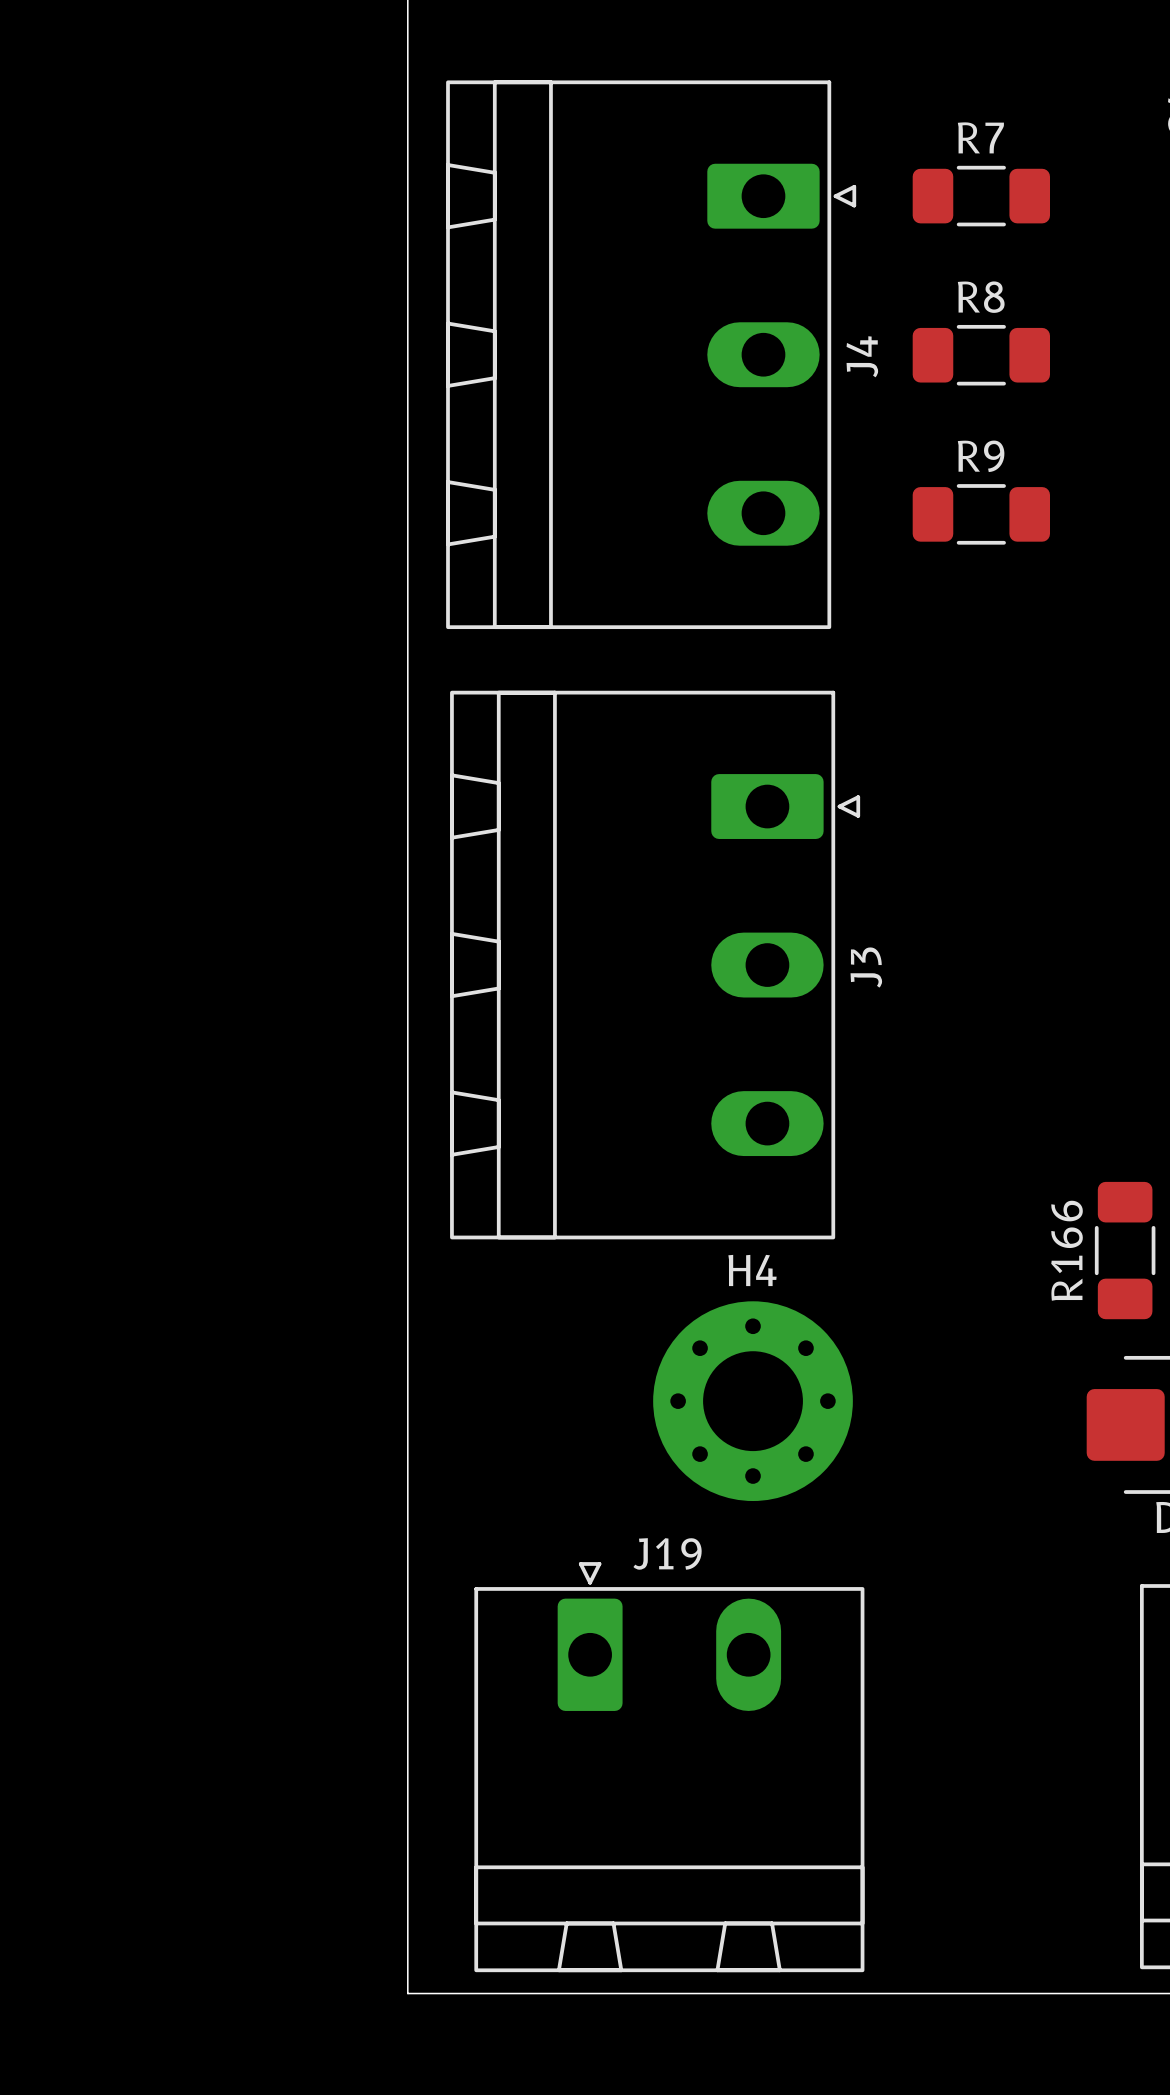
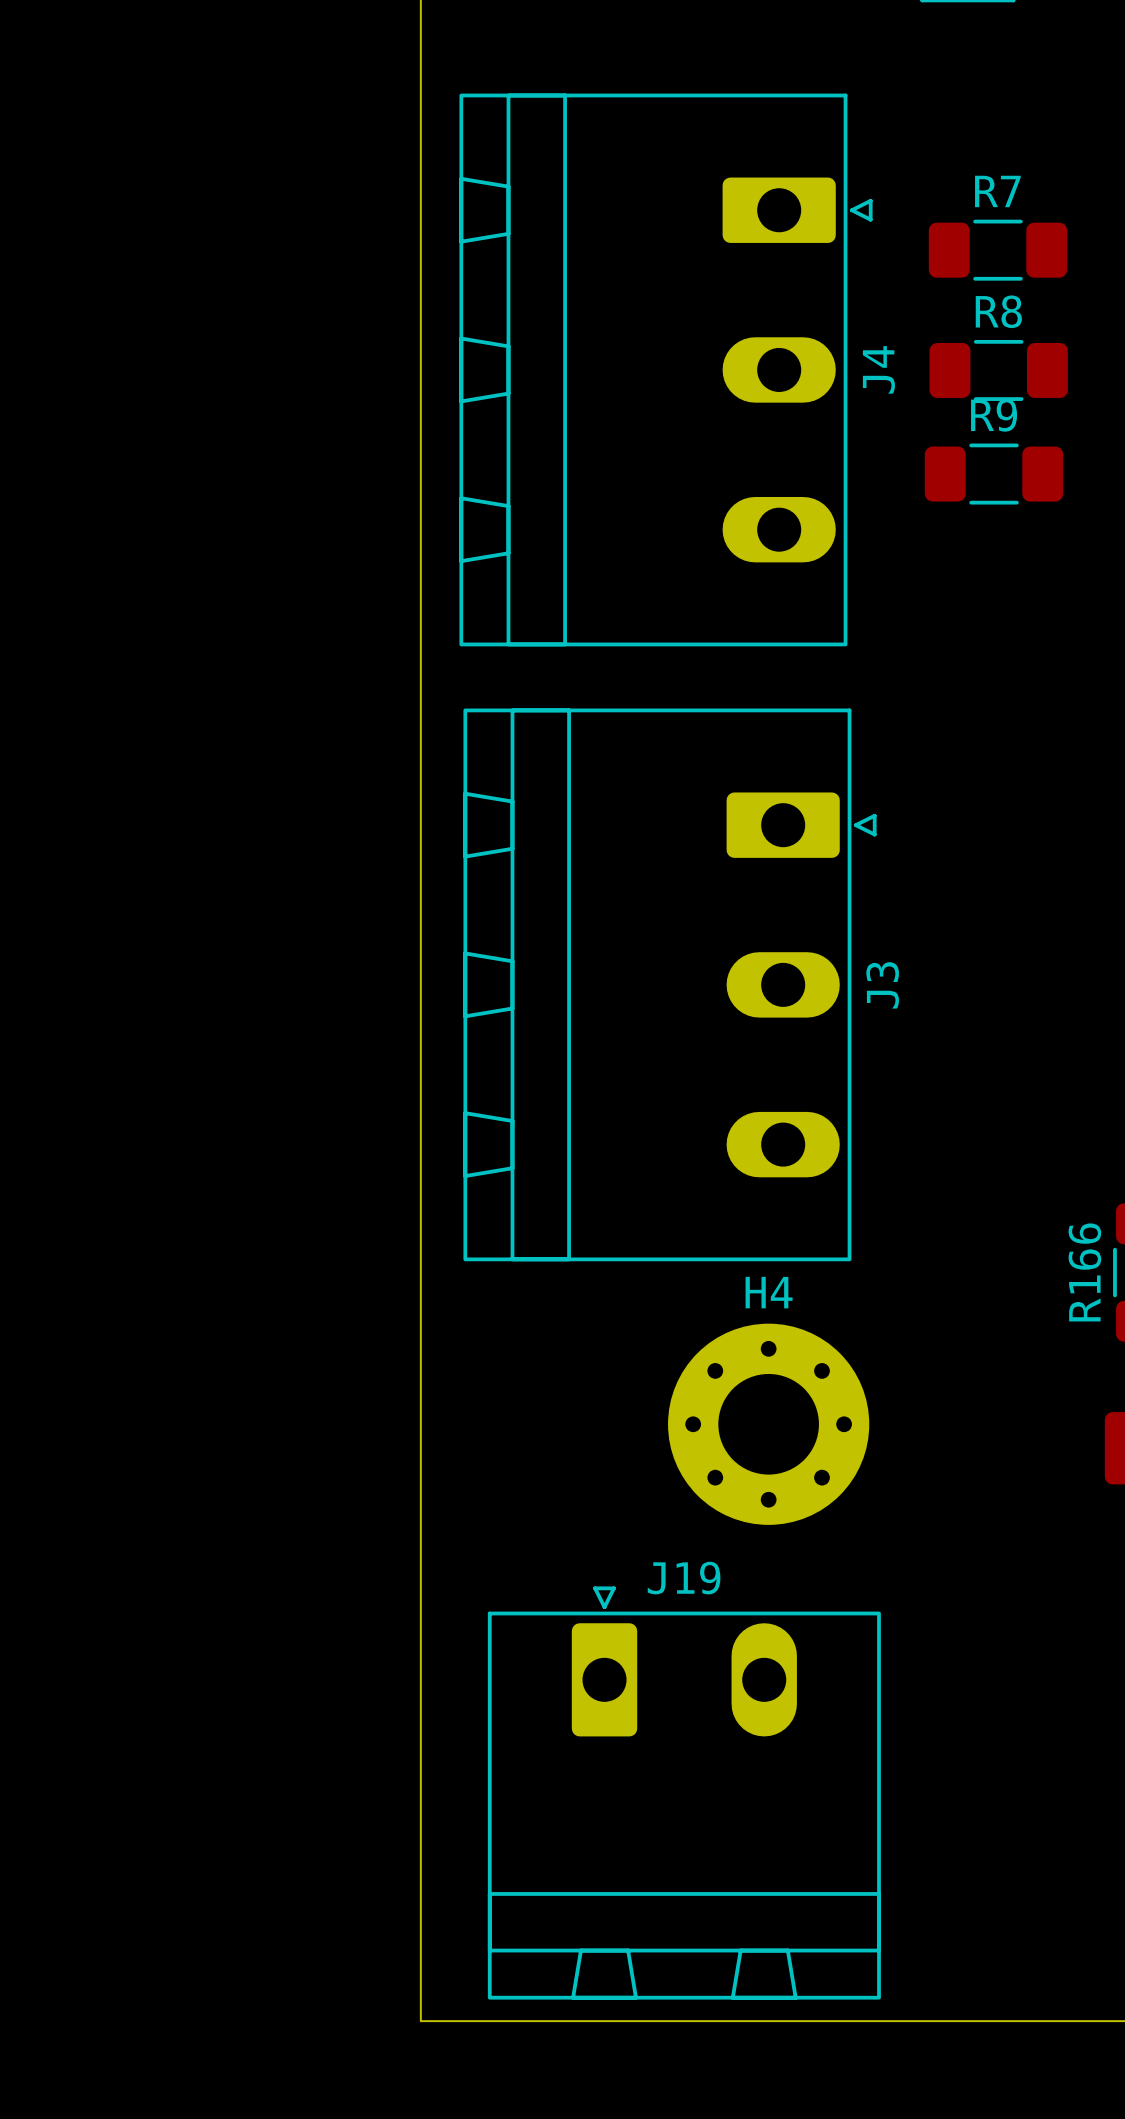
R7 position: (981, 196) -> (997, 250)
R9 position: (981, 514) -> (994, 474)

